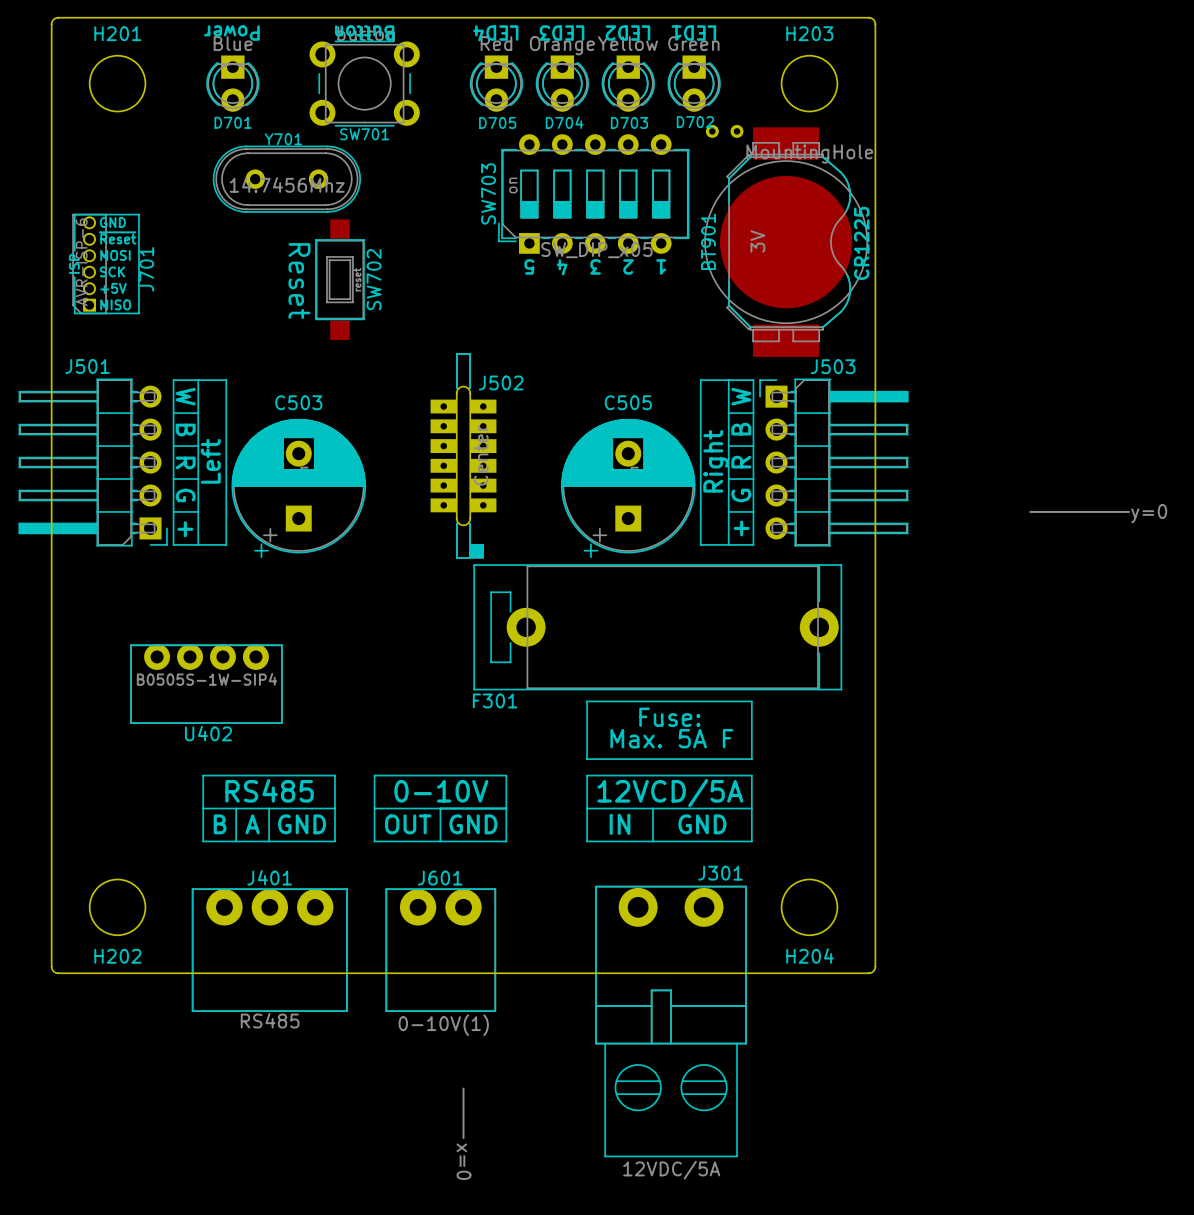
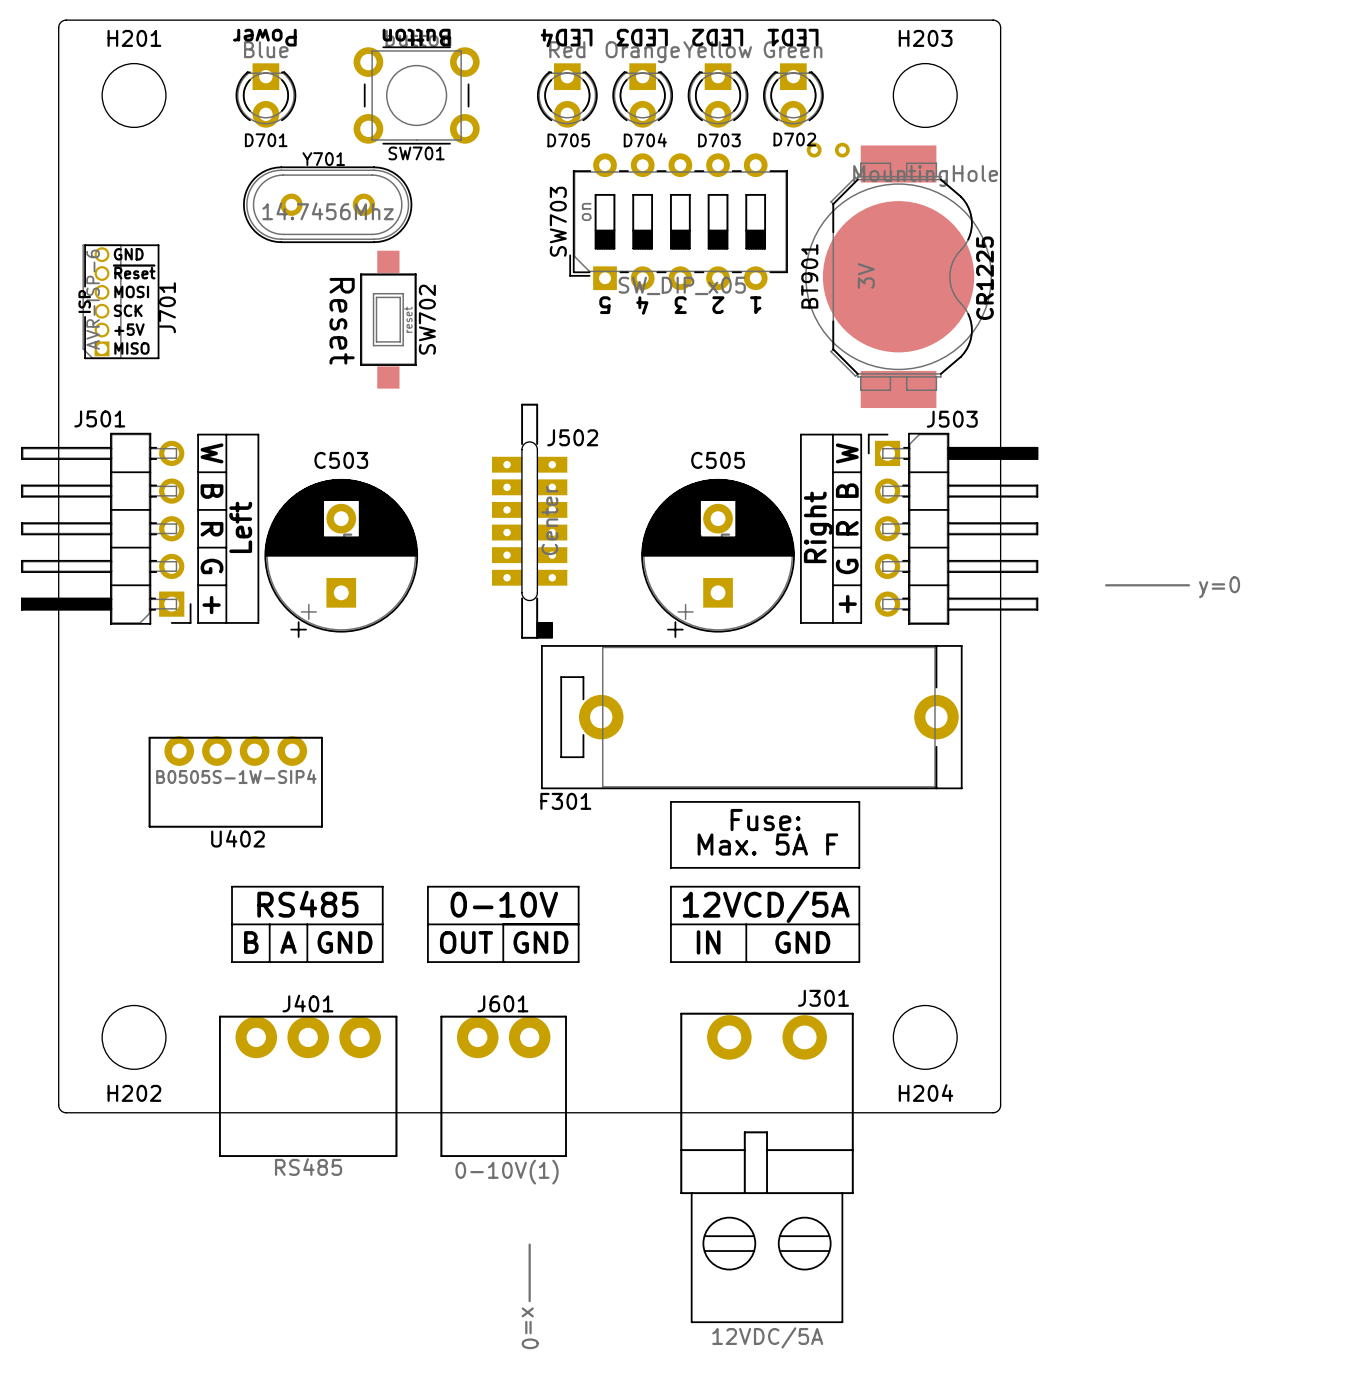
line: none -> (1106, 585) (1177, 585)
line: (1040, 511) (1129, 511) -> none
text position: y=0 (1149, 513) -> y=0 (1219, 587)

